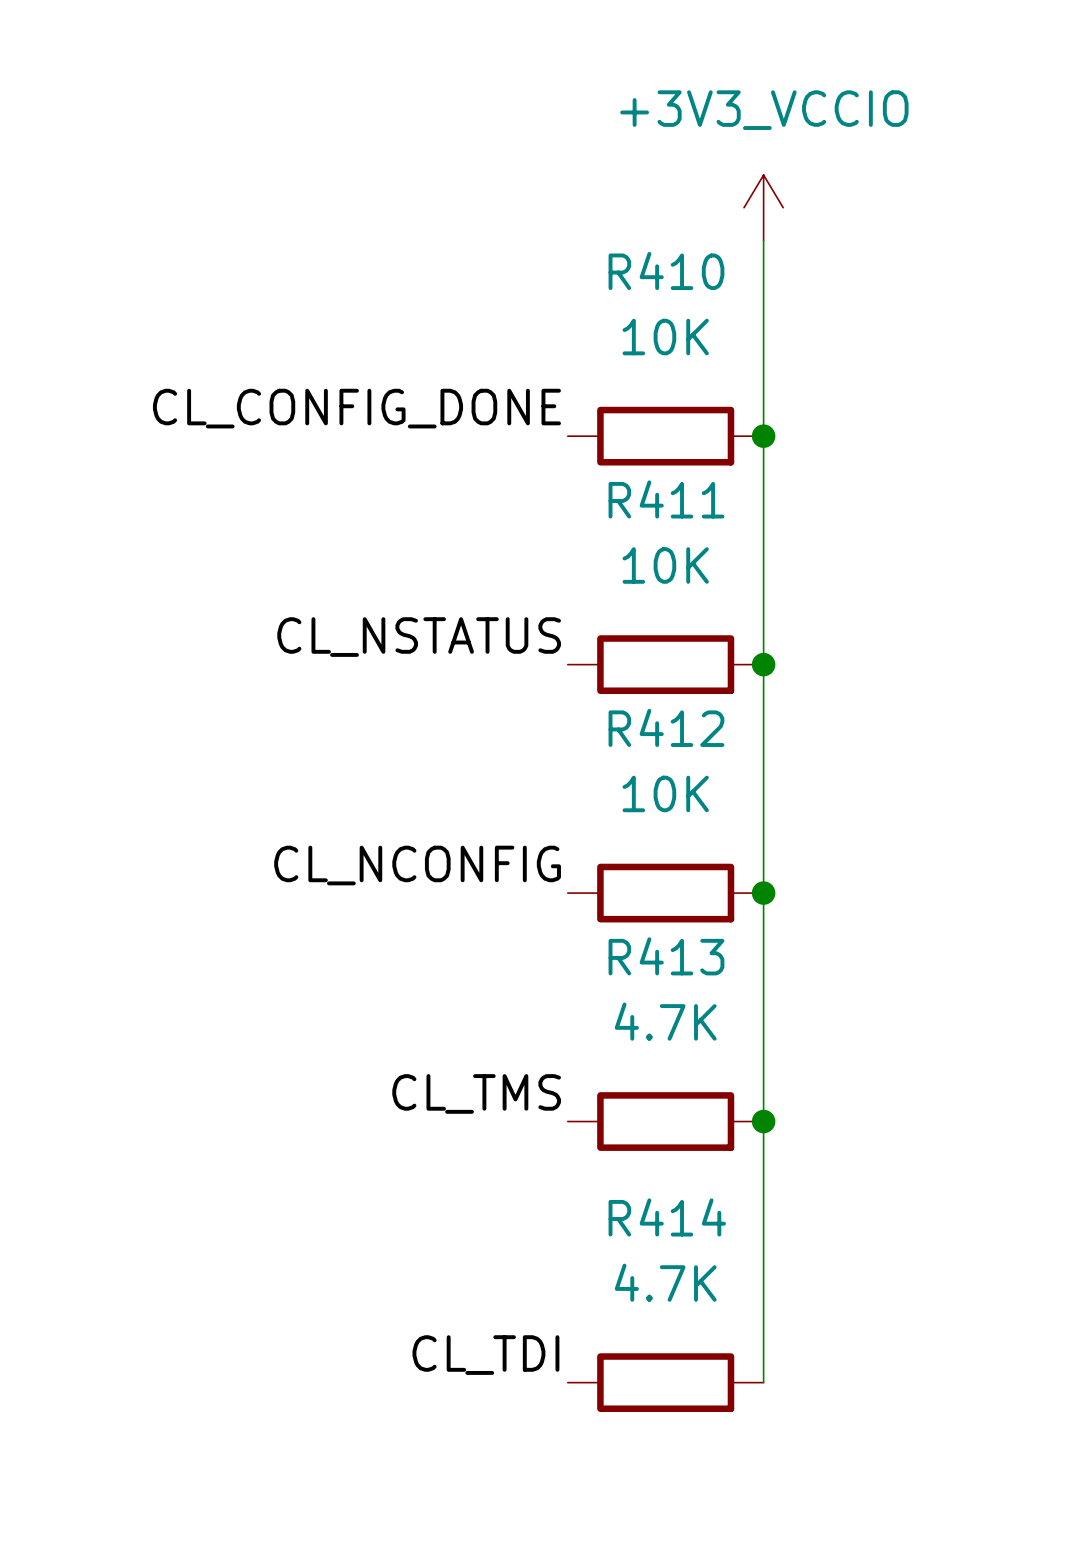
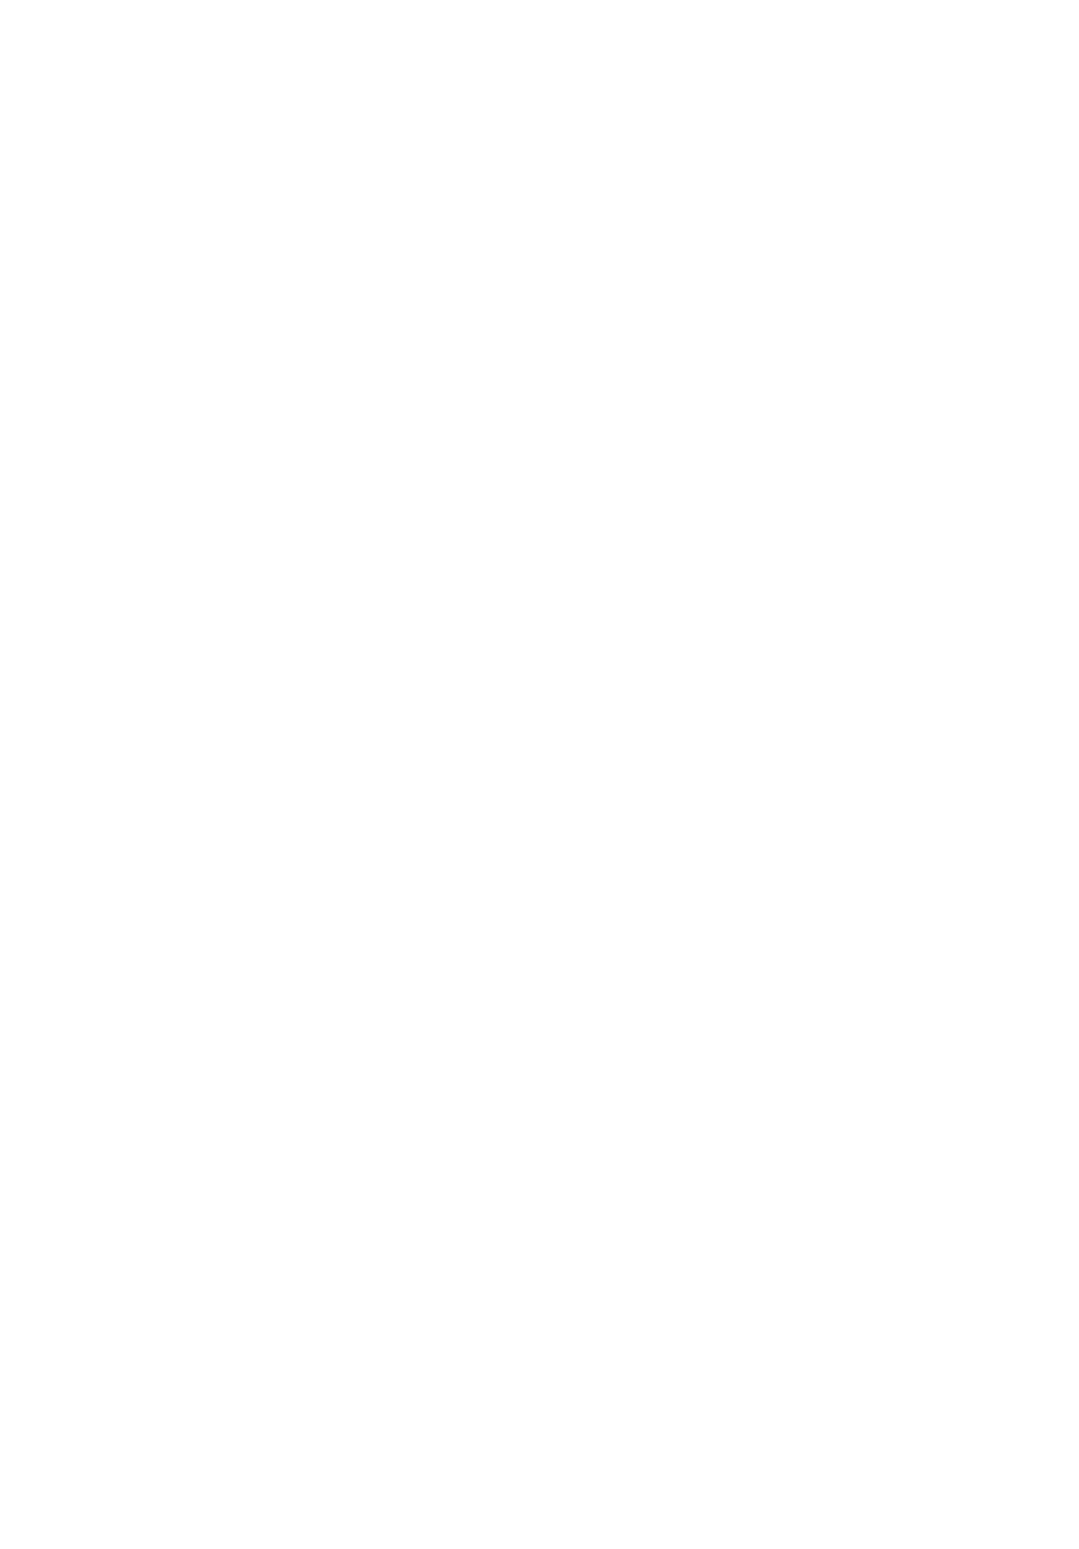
power symbol: +3V3_VCCIO (763, 207) -> none
wire: (763, 240) (763, 1382) -> none
label: CL_CONFIG_DONE (356, 408) -> none
R410: 10K (665, 436) -> none
junction: (763, 436) -> none
label: CL_NSTATUS (419, 637) -> none
R411: 10K (665, 664) -> none
junction: (763, 664) -> none
label: CL_NCONFIG (417, 865) -> none
R412: 10K (665, 893) -> none
junction: (763, 893) -> none
label: CL_TMS (476, 1093) -> none
R413: 4.7K (665, 1121) -> none
junction: (763, 1121) -> none
label: CL_TDI (485, 1355) -> none
R414: 4.7K (665, 1382) -> none

